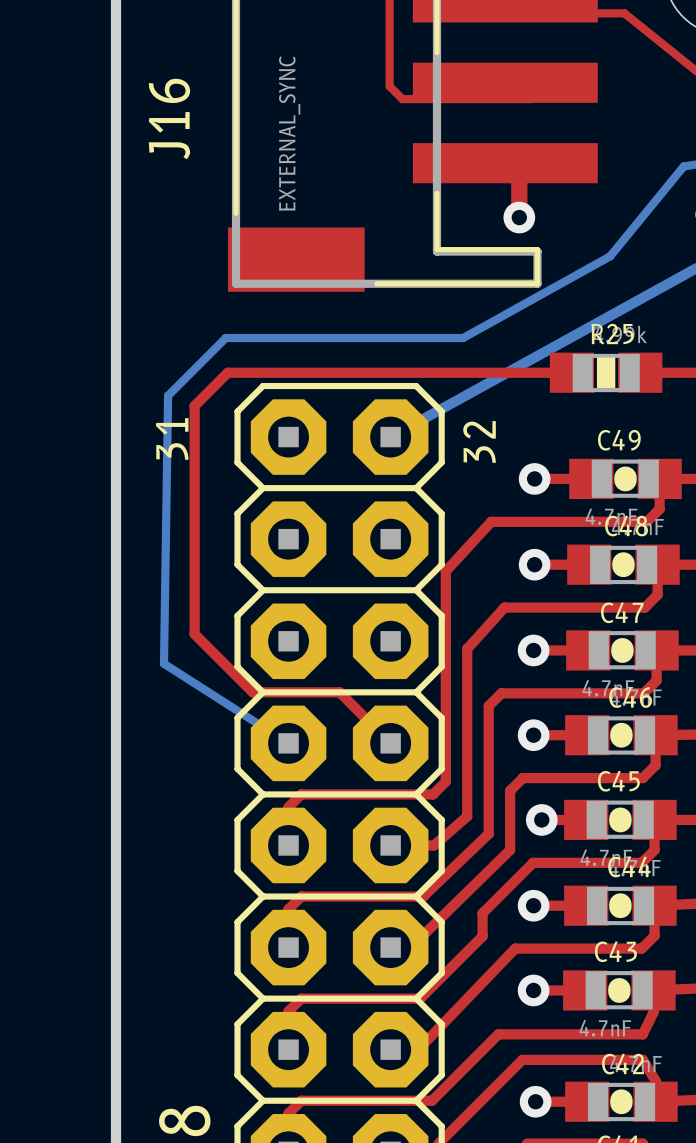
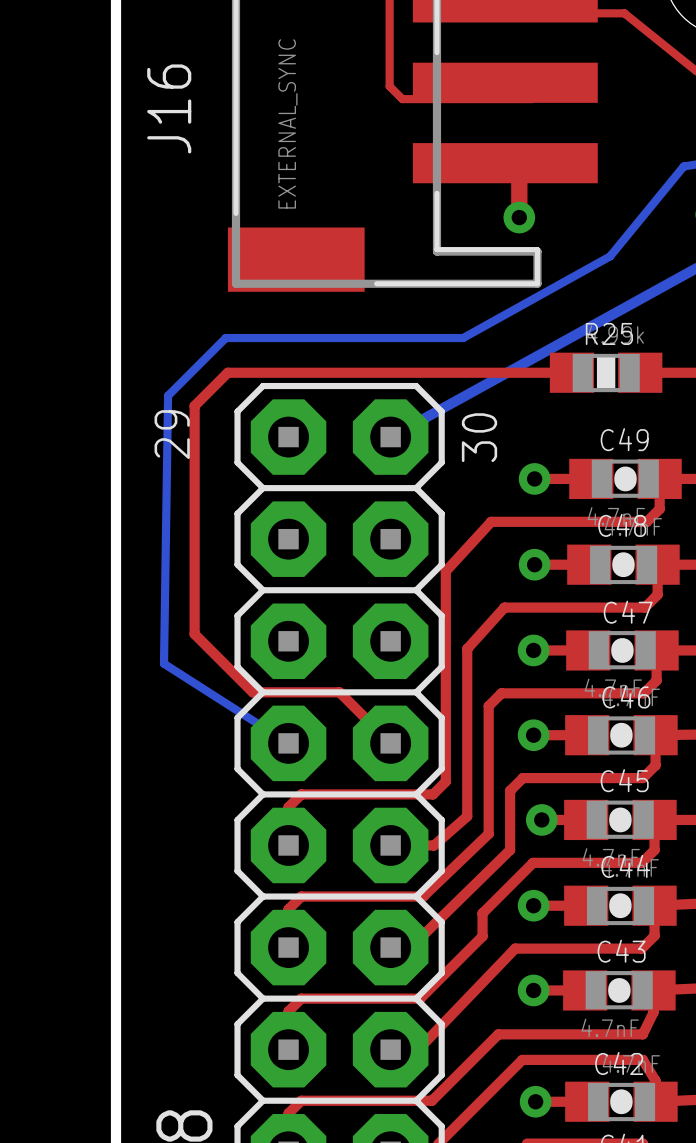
text: 31 (172, 438) -> 29 (172, 434)
text: 32 (479, 441) -> 30 (479, 437)

